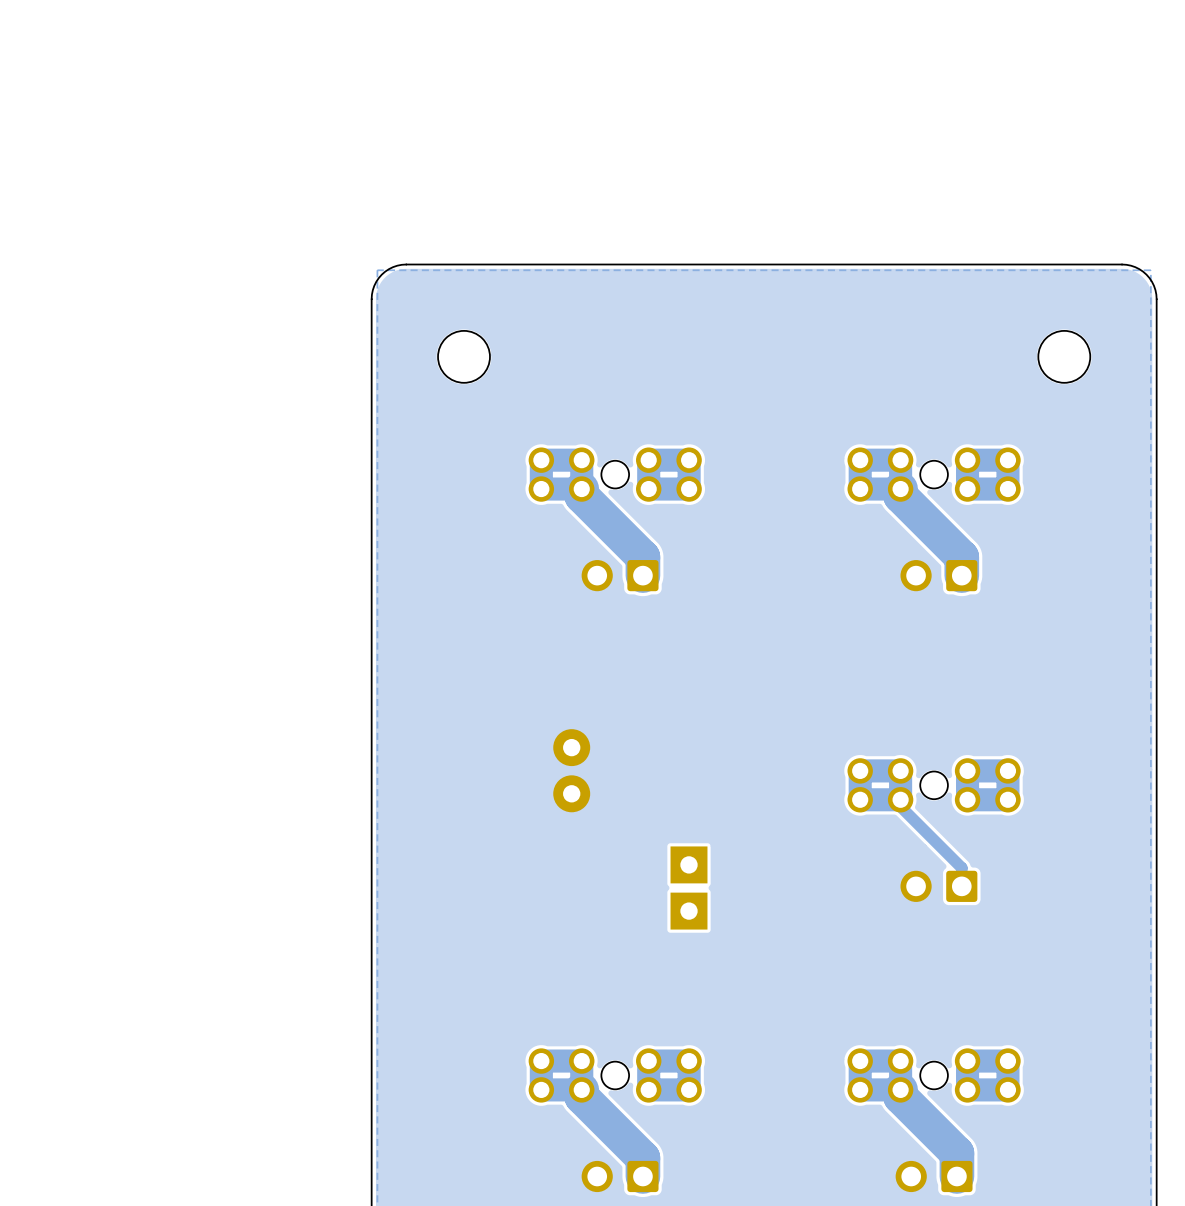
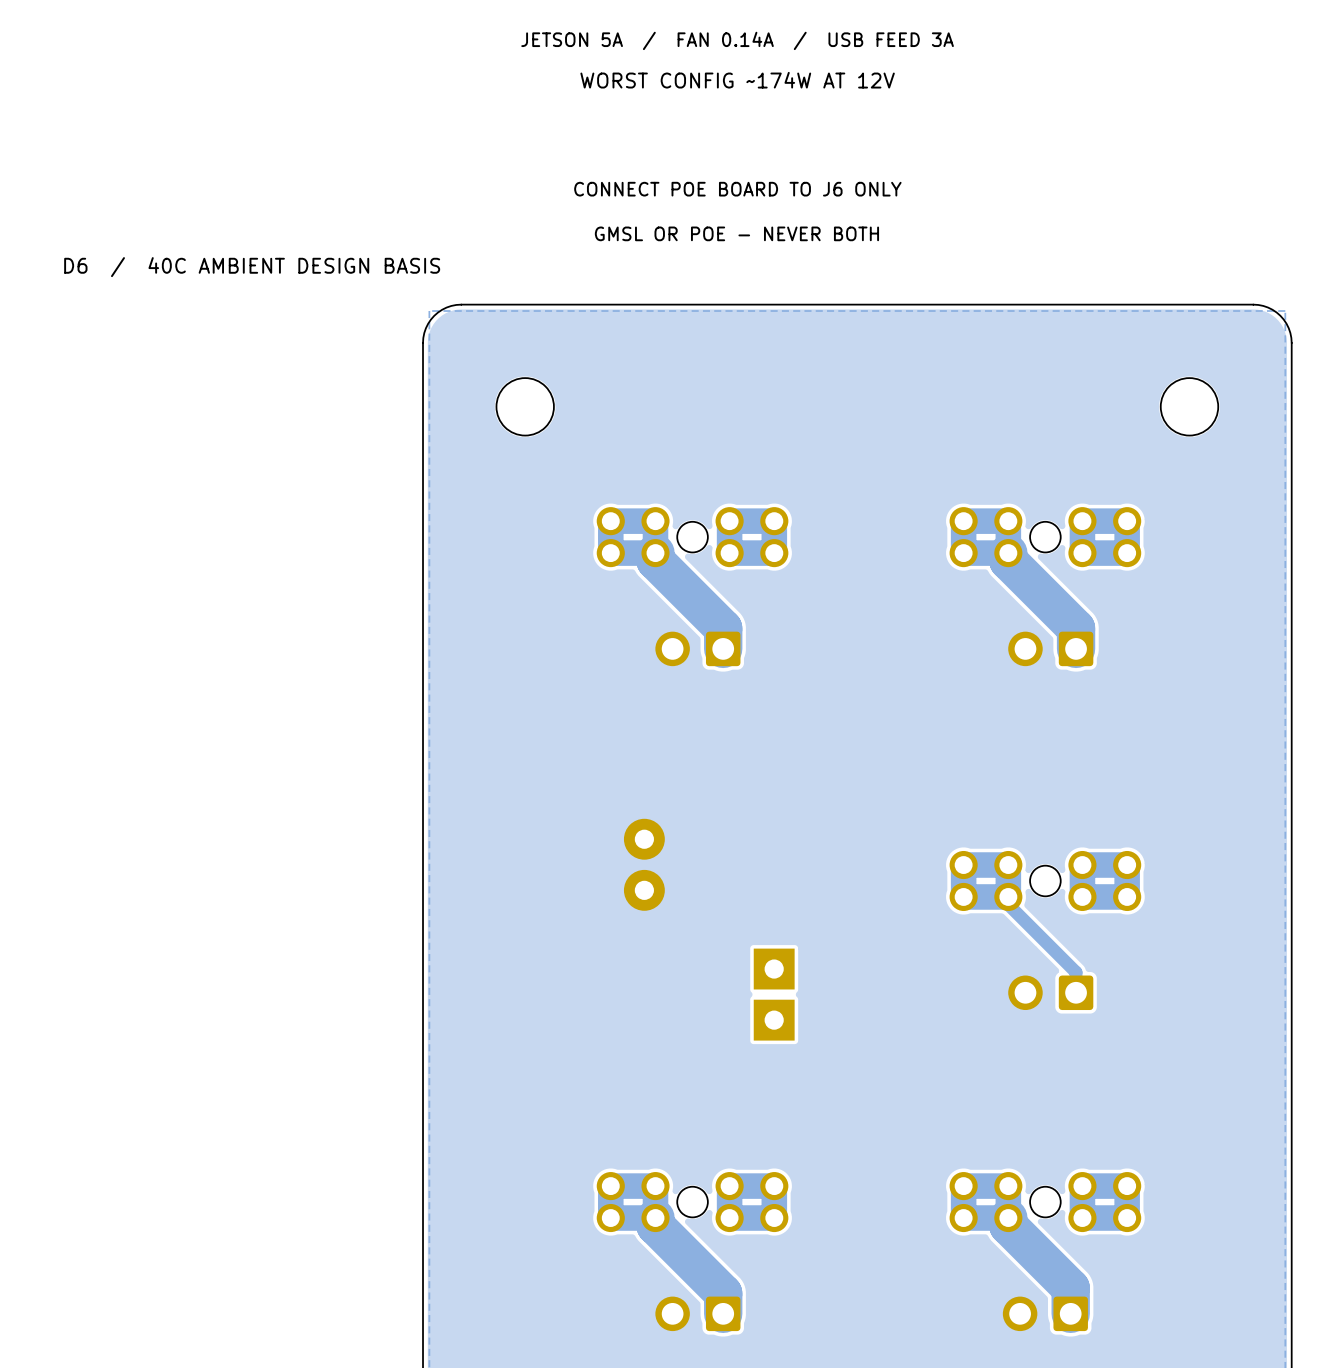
text: none -> JETSON 5A / FAN 0.14A / USB FEED 3A (737, 40)
text: none -> WORST CONFIG ~174W AT 12V (737, 80)
text: none -> CONNECT POE BOARD TO J6 ONLY (737, 189)
text: none -> GMSL OR POE - NEVER BOTH (736, 233)
text: none -> D6 / 40C AMBIENT DESIGN BASIS (252, 267)

